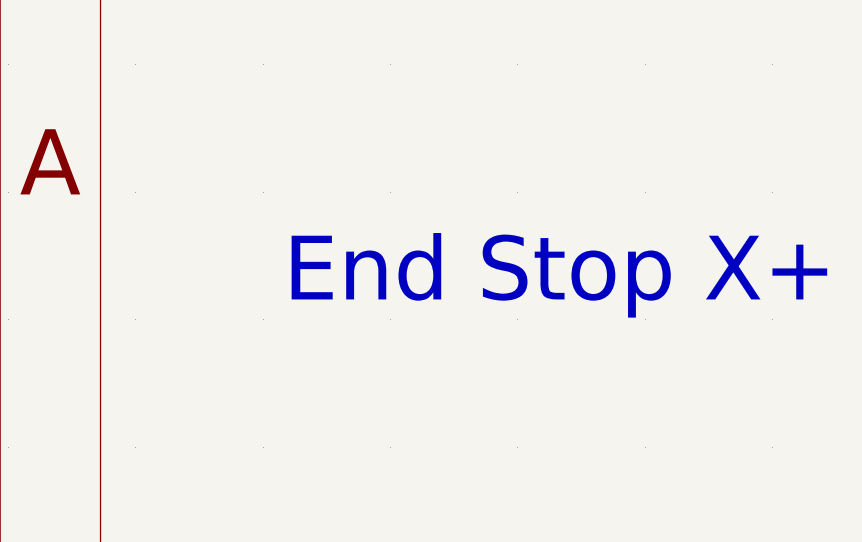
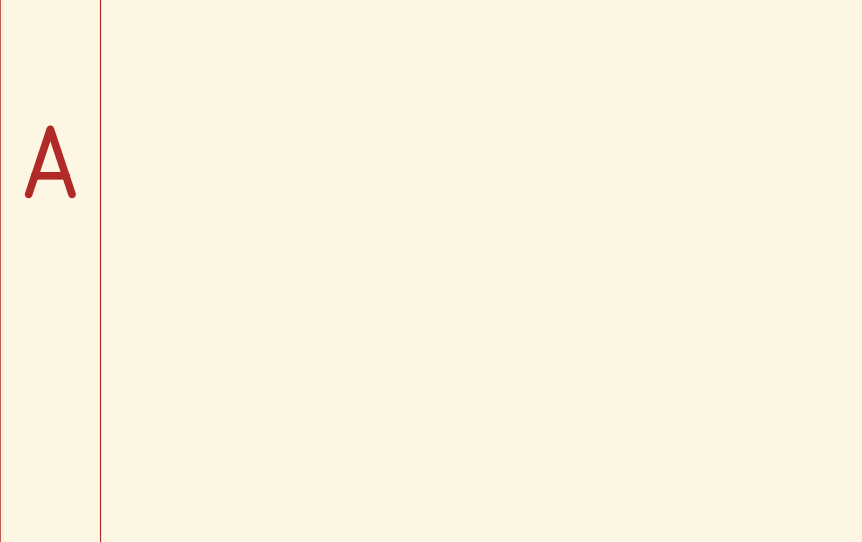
text: End Stop X+ (559, 275) -> none

